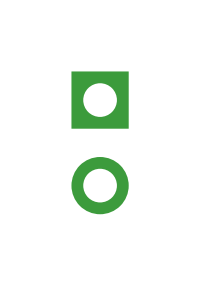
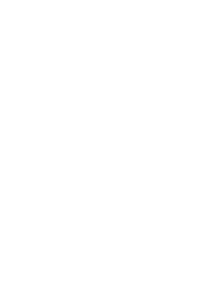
part: (100, 142) -> none

